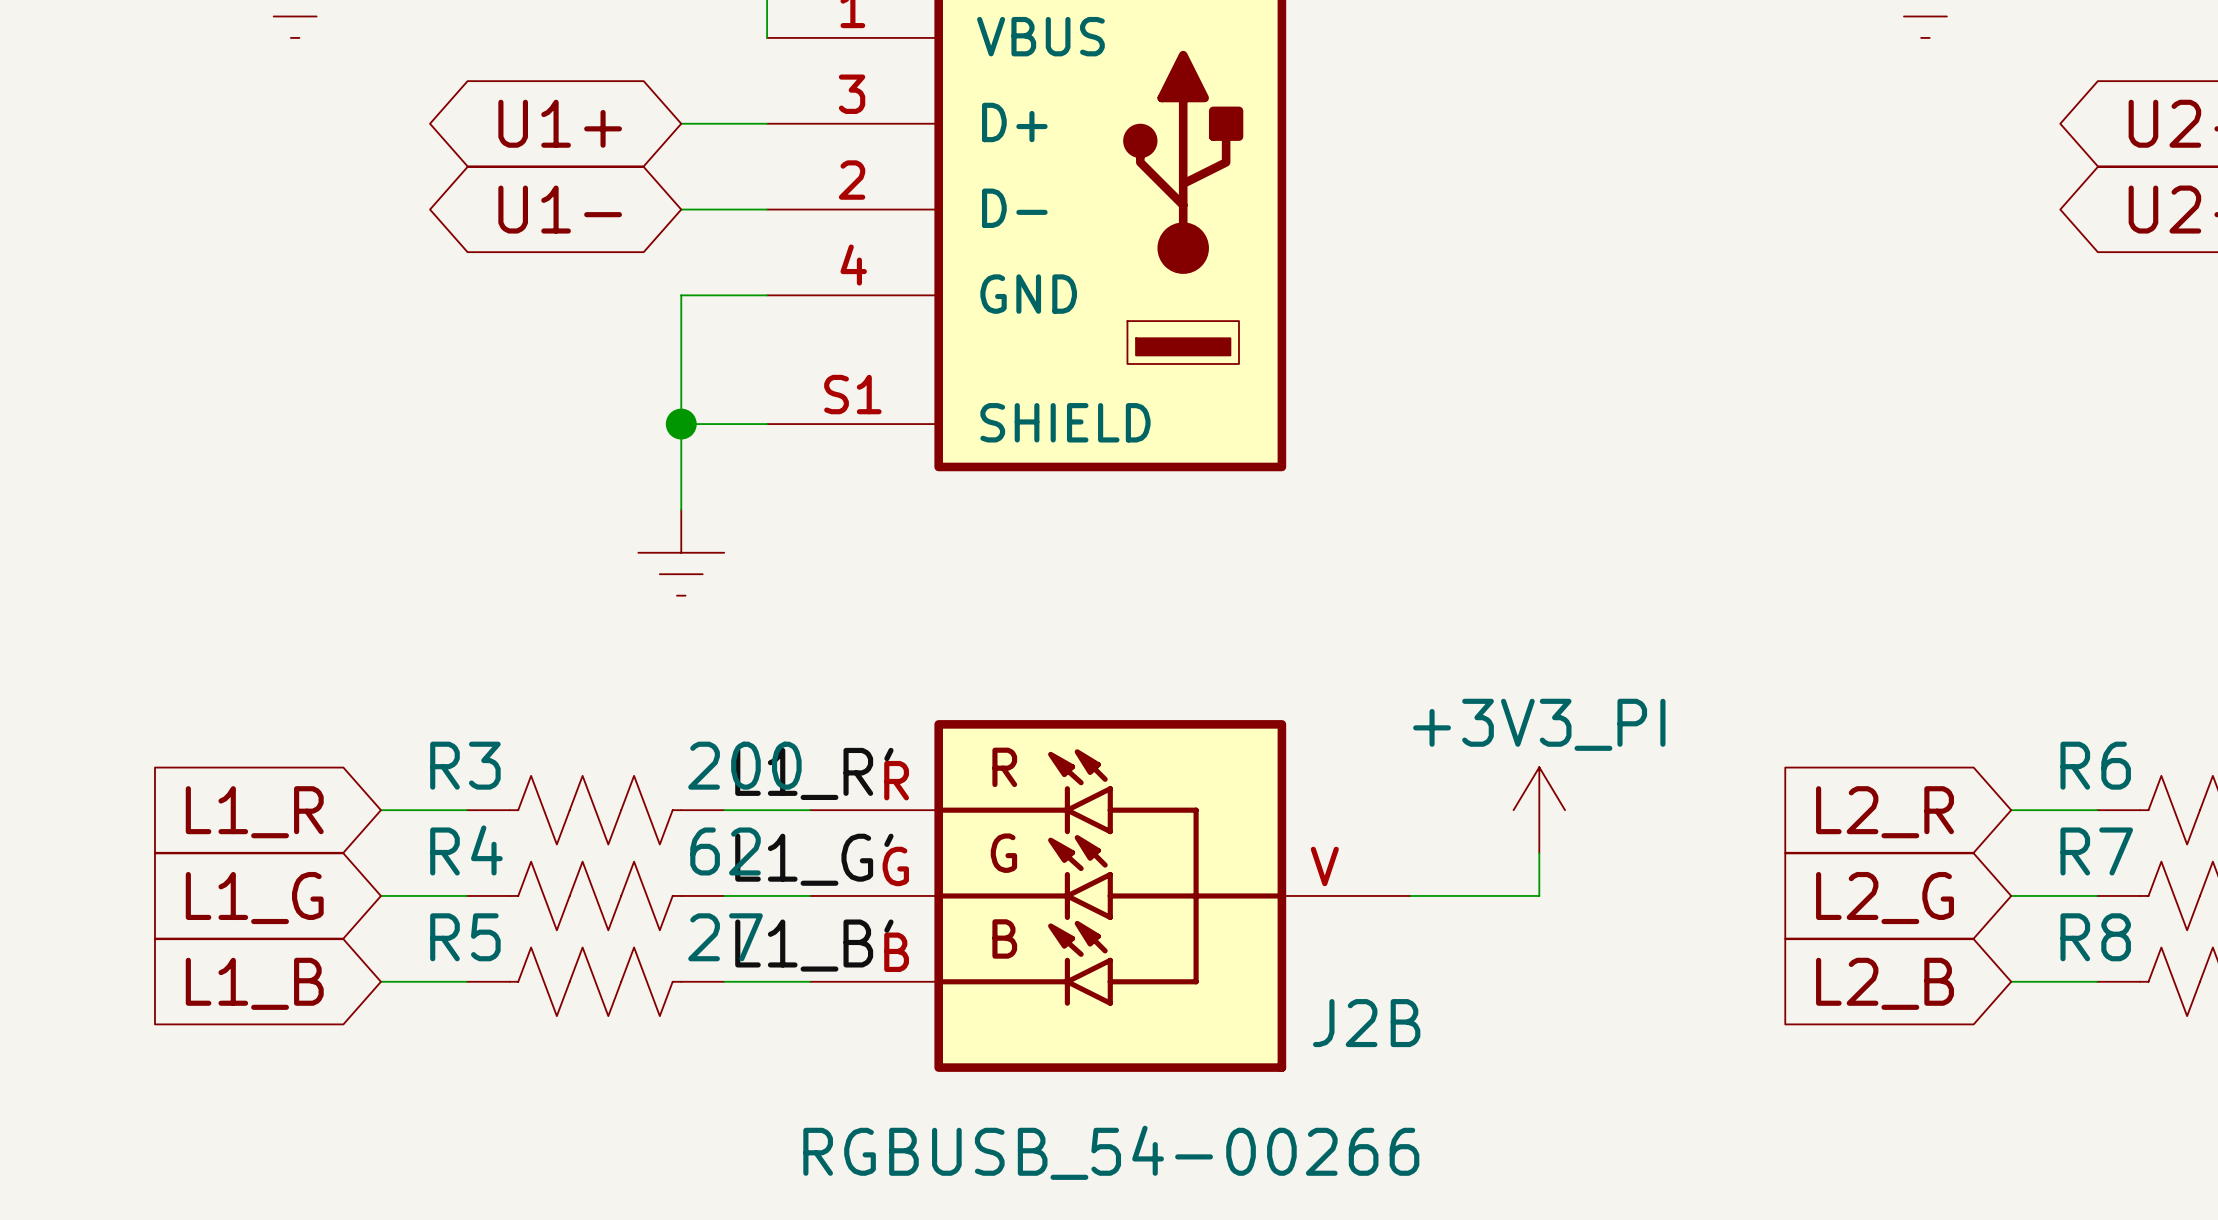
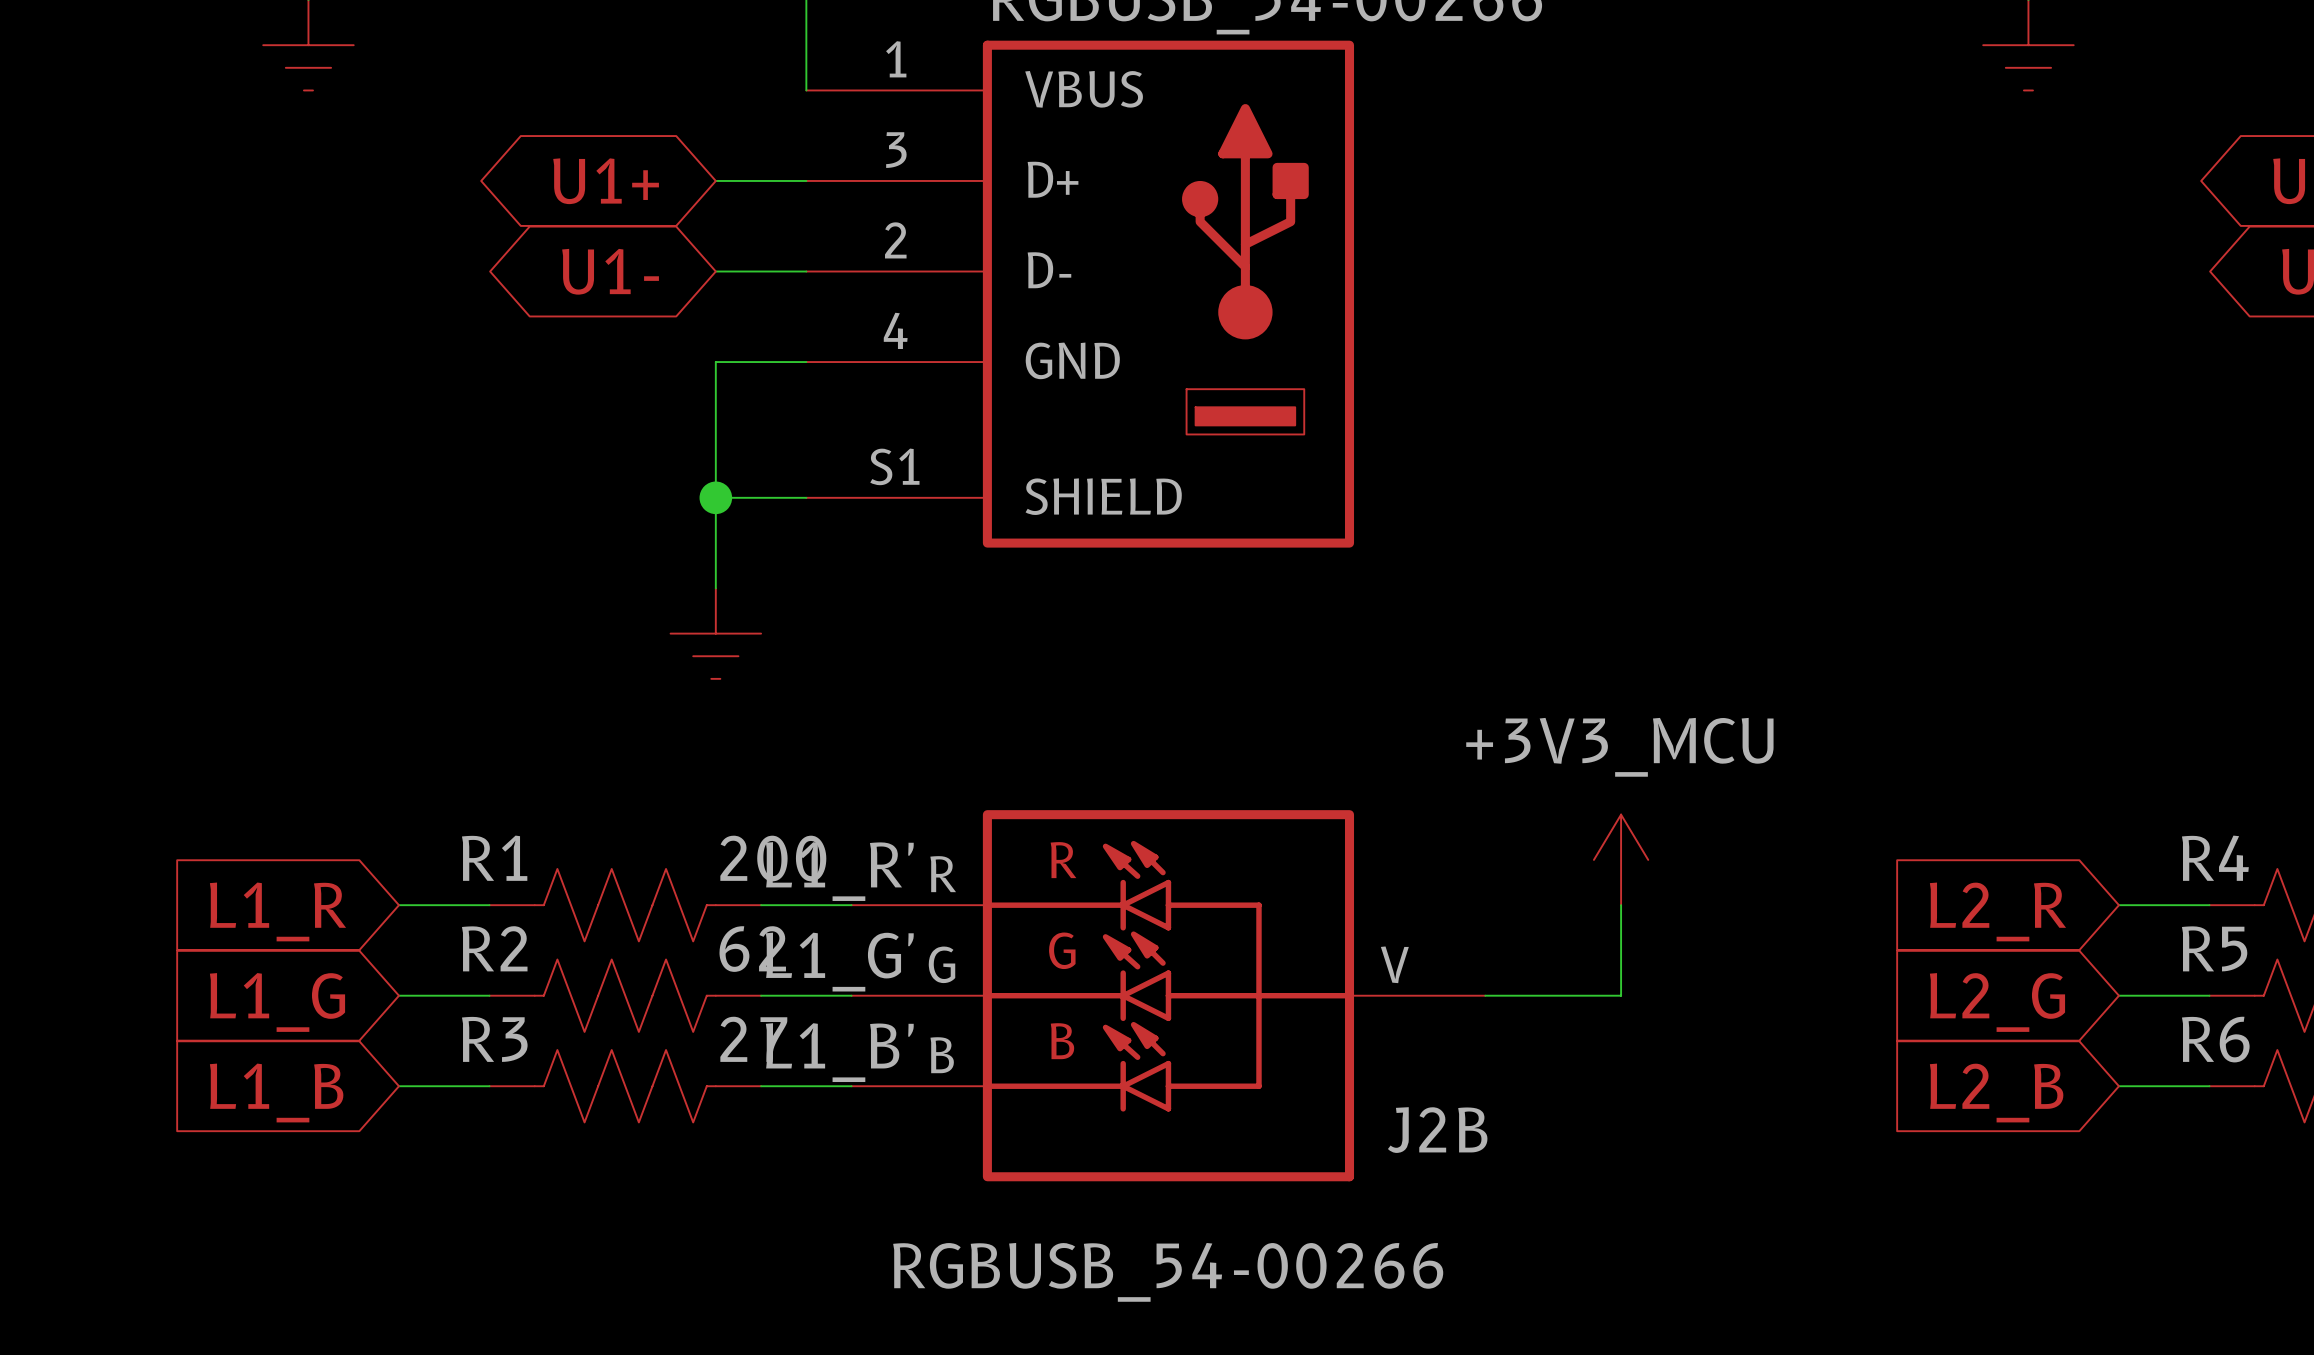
R3 name: R3 (465, 765) -> R1 (494, 858)
R6 name: R6 (2095, 765) -> R4 (2215, 858)
power symbol: none -> +3V3_MCU (1621, 859)
power symbol: +3V3_PI (1539, 810) -> none
R4 name: R4 (466, 850) -> R2 (494, 948)
R7 name: R7 (2096, 851) -> R5 (2214, 948)
R5 name: R5 (465, 937) -> R3 (494, 1039)
R8 name: R8 (2095, 937) -> R6 (2215, 1039)

